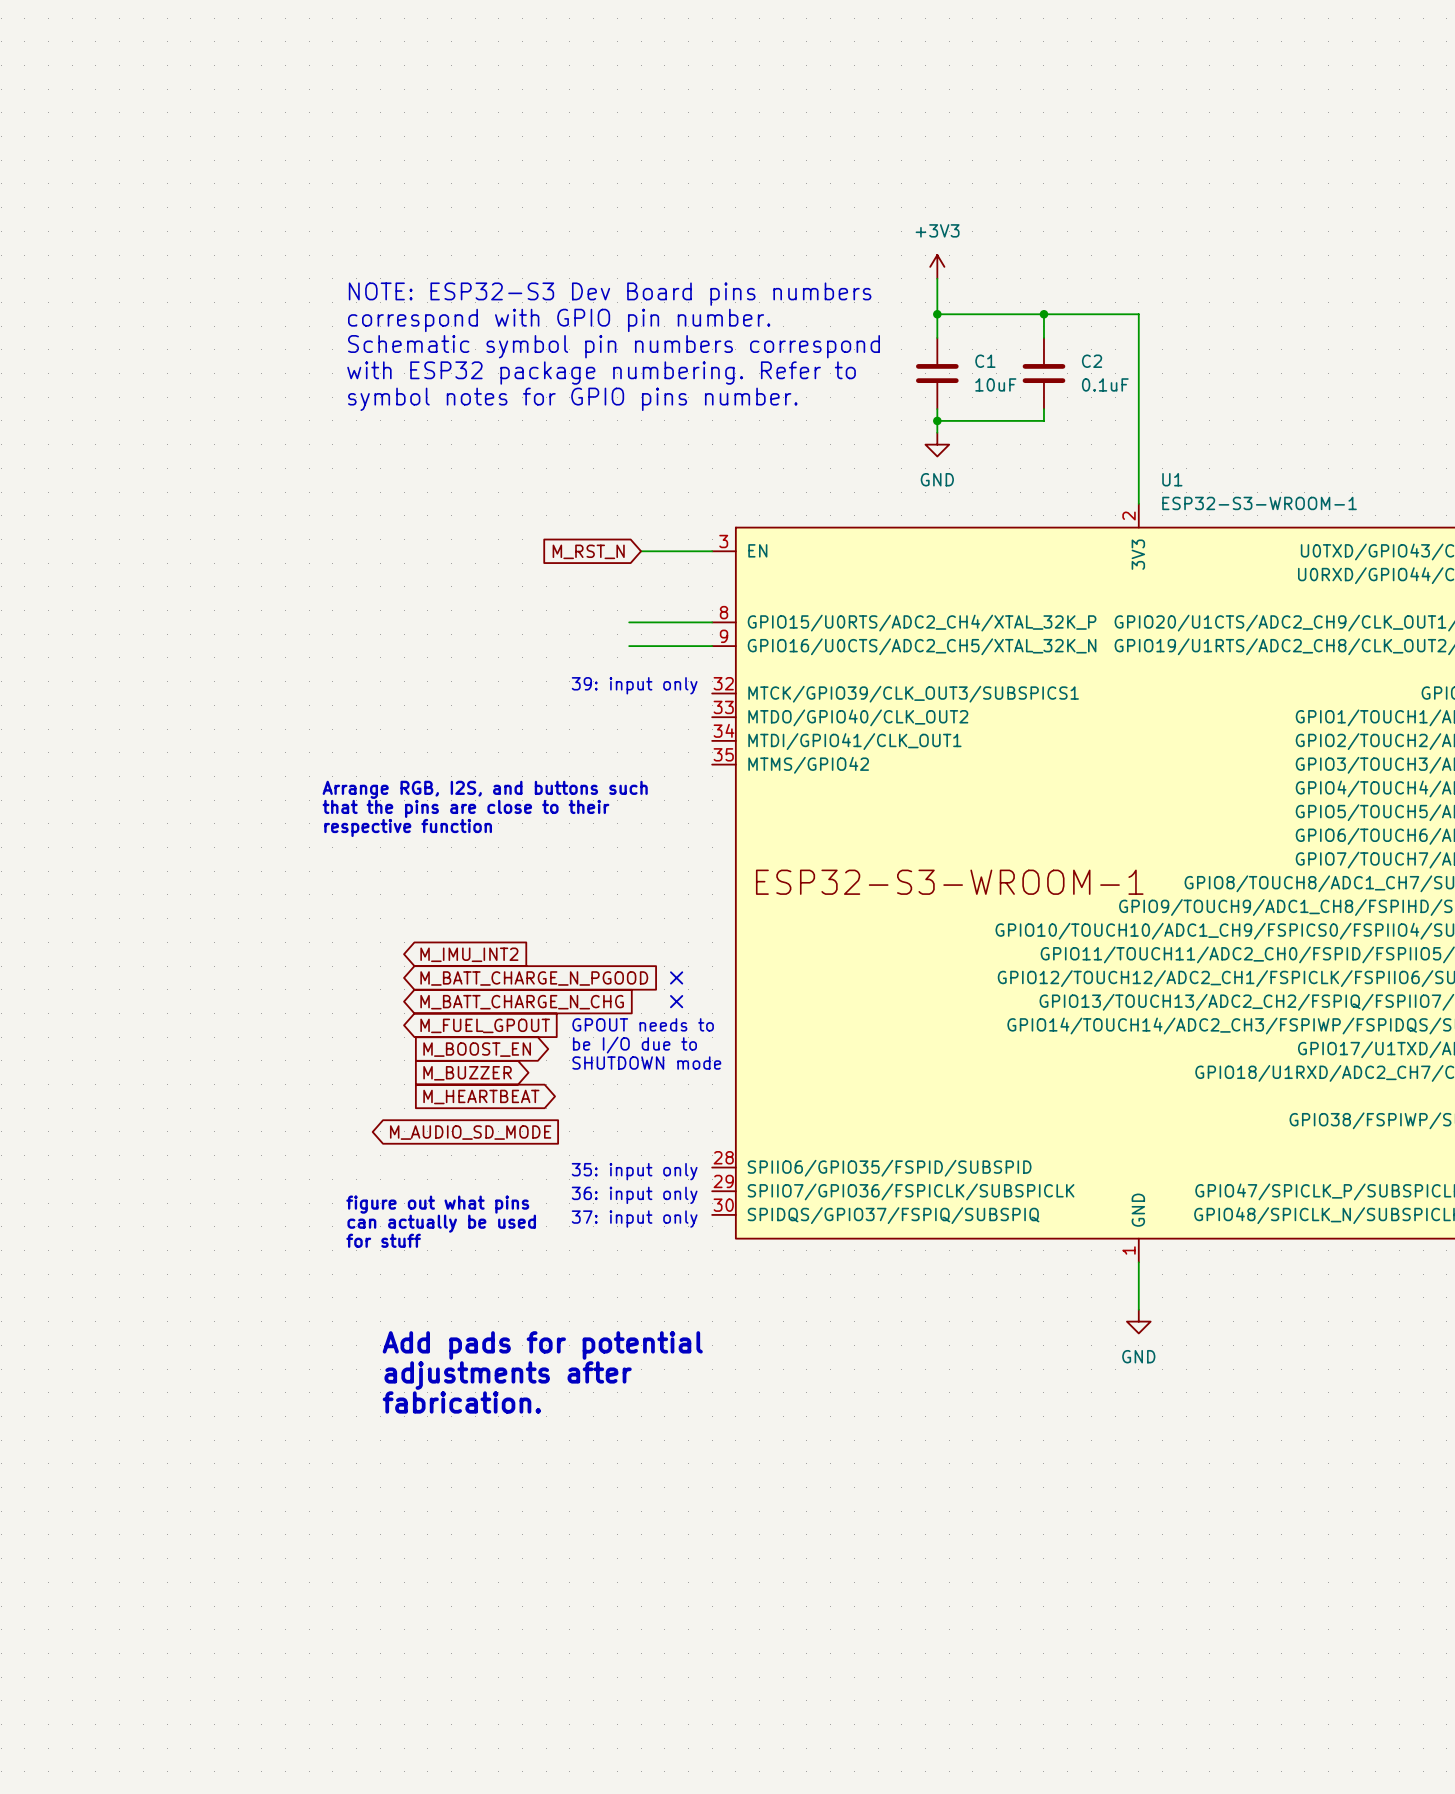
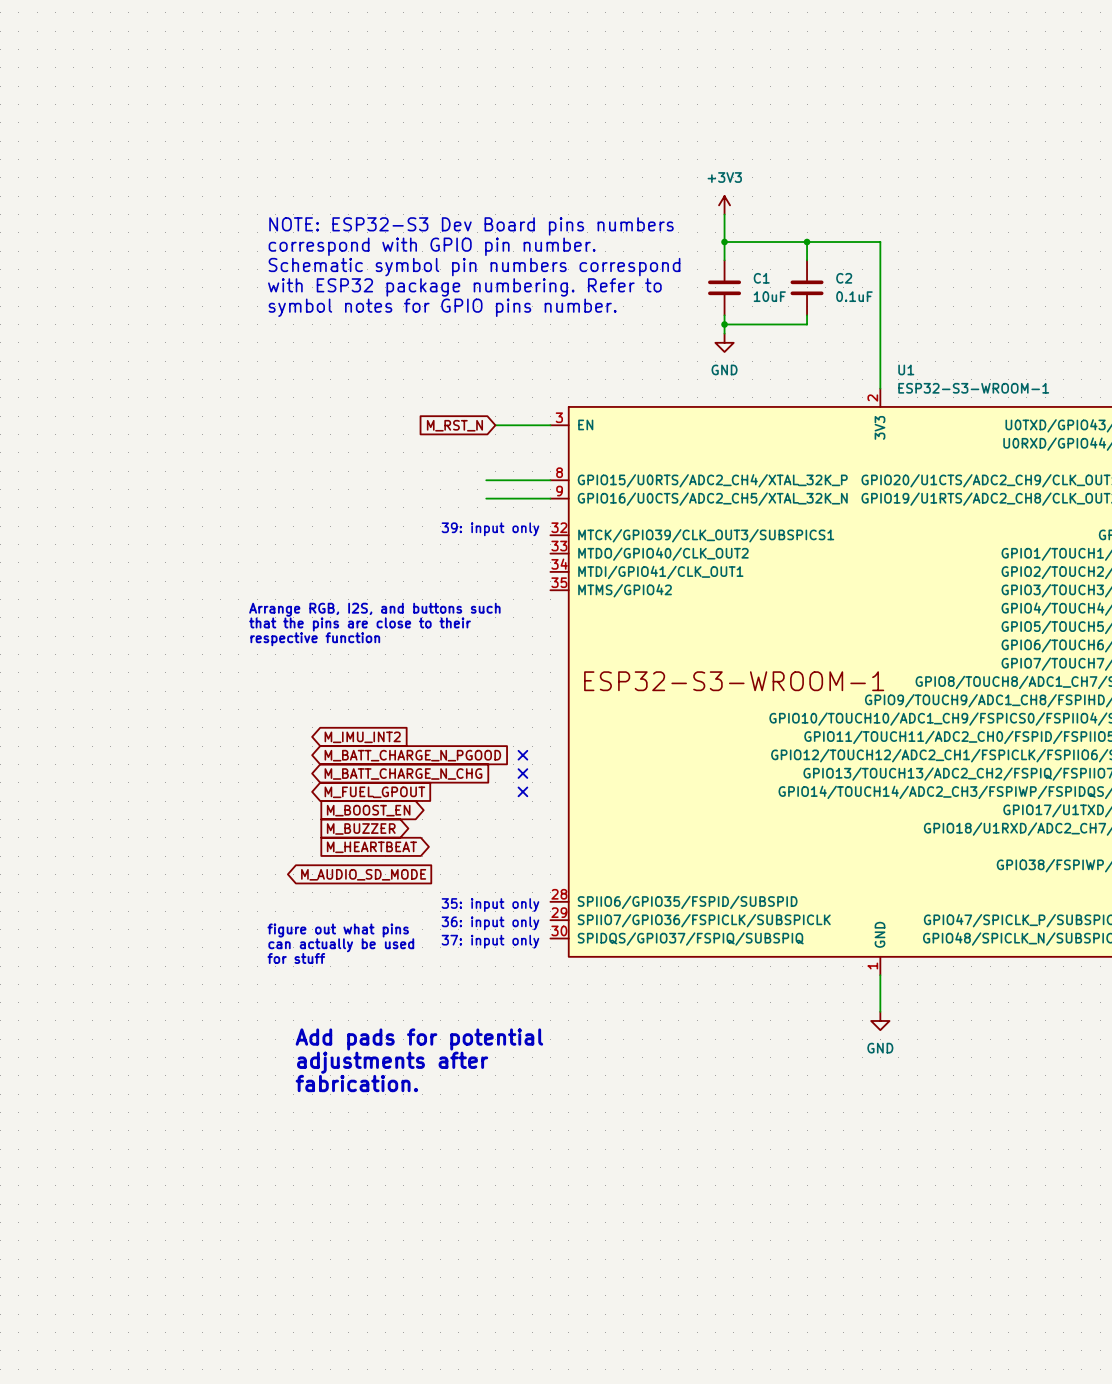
text: GPOUT needs to (643, 1024) -> none
no-connect mark: none -> (522, 791)
text: be I/O due to (634, 1045) -> none
text: SHUTDOWN mode (646, 1063) -> none

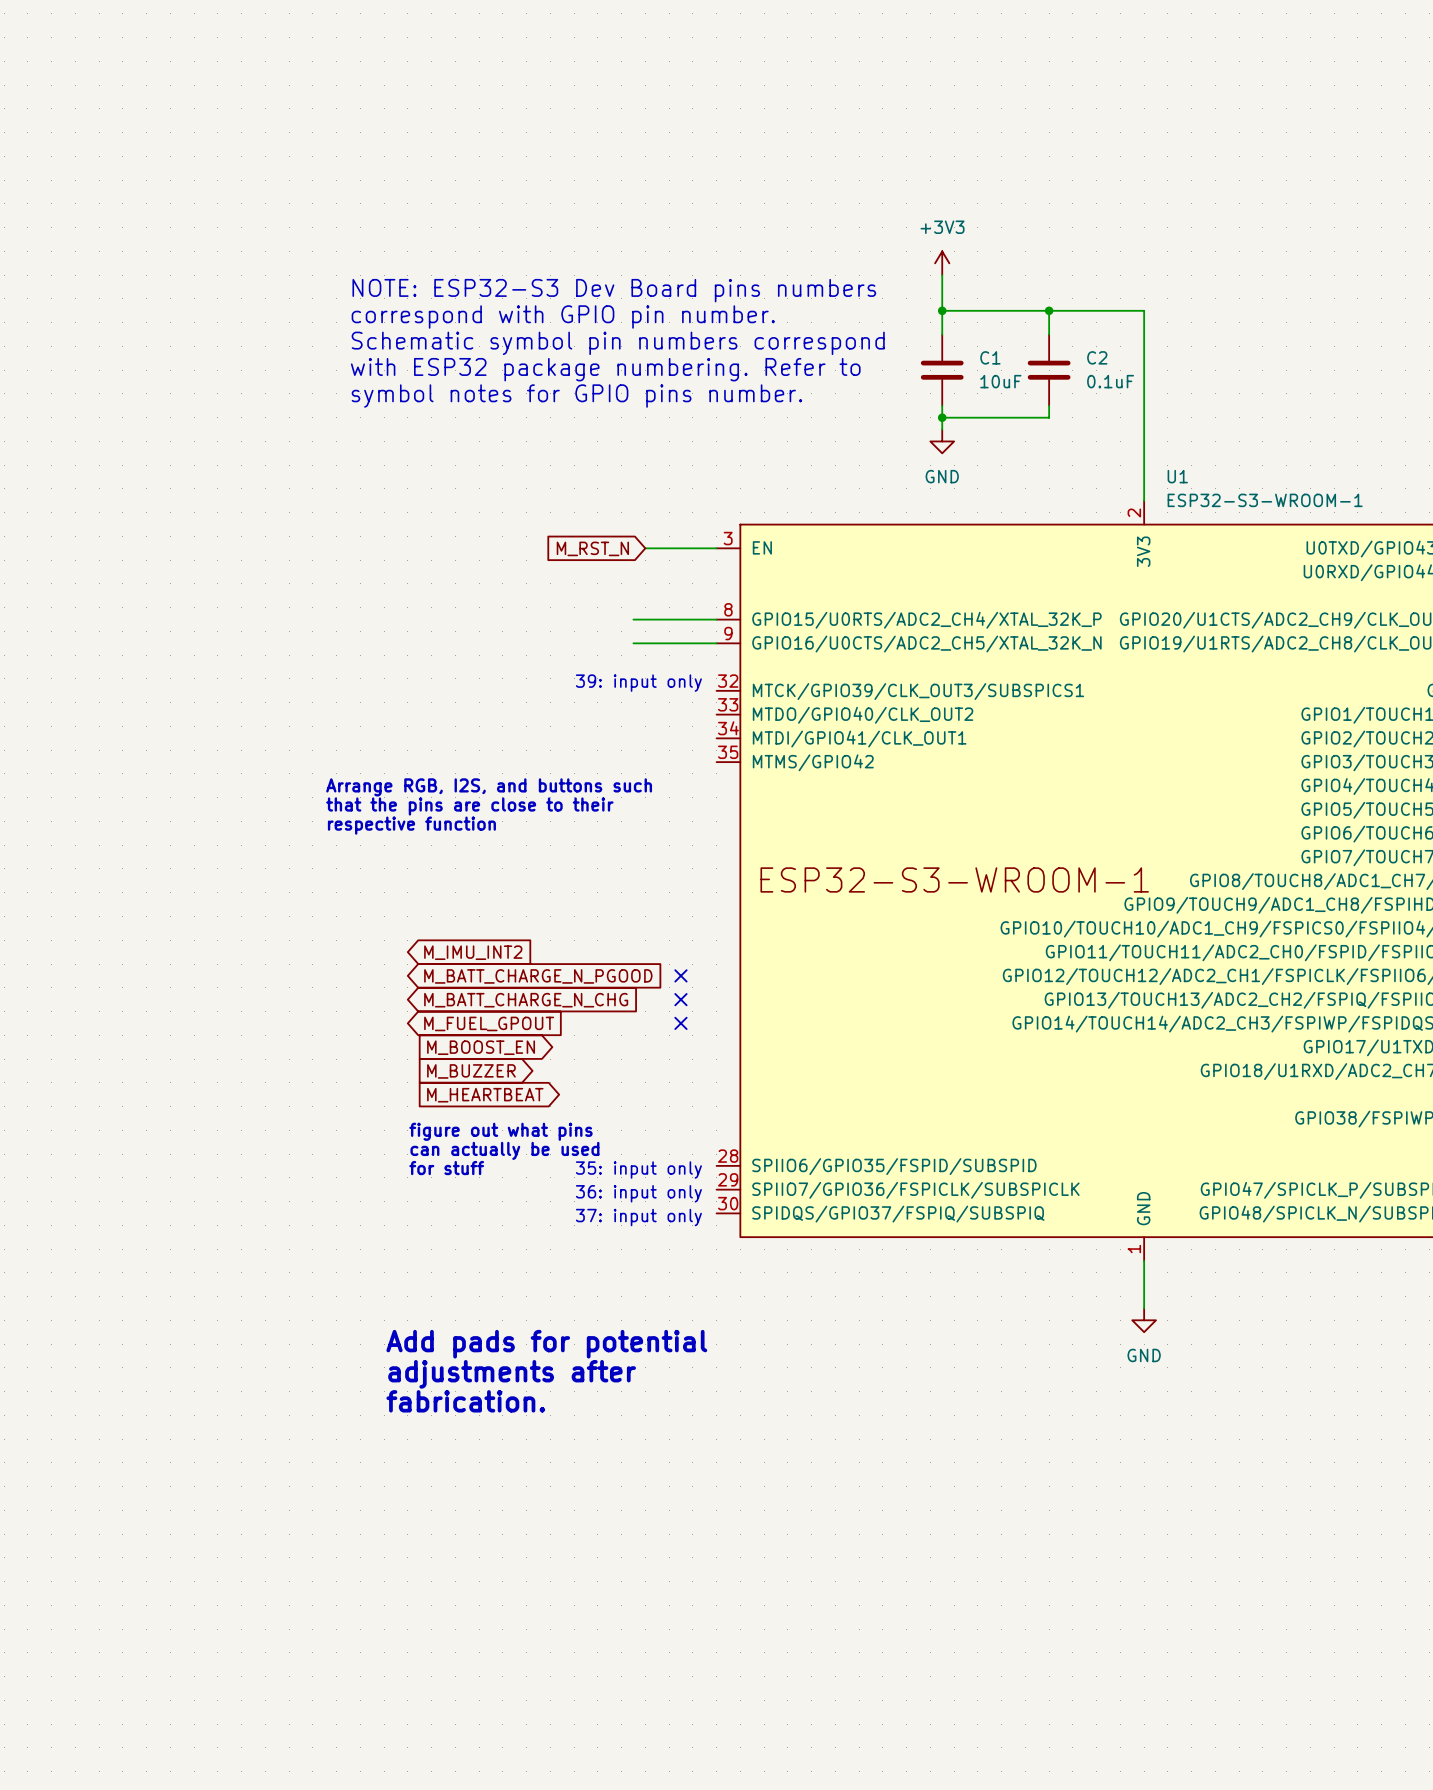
global label: M_AUDIO_SD_MODE (363, 874) -> none
text position: figure out what pins (338, 930) -> figure out what pins (500, 1131)
text position: can actually be used (341, 945) -> can actually be used (504, 1150)
text position: for stuff (296, 958) -> for stuff (446, 1168)

